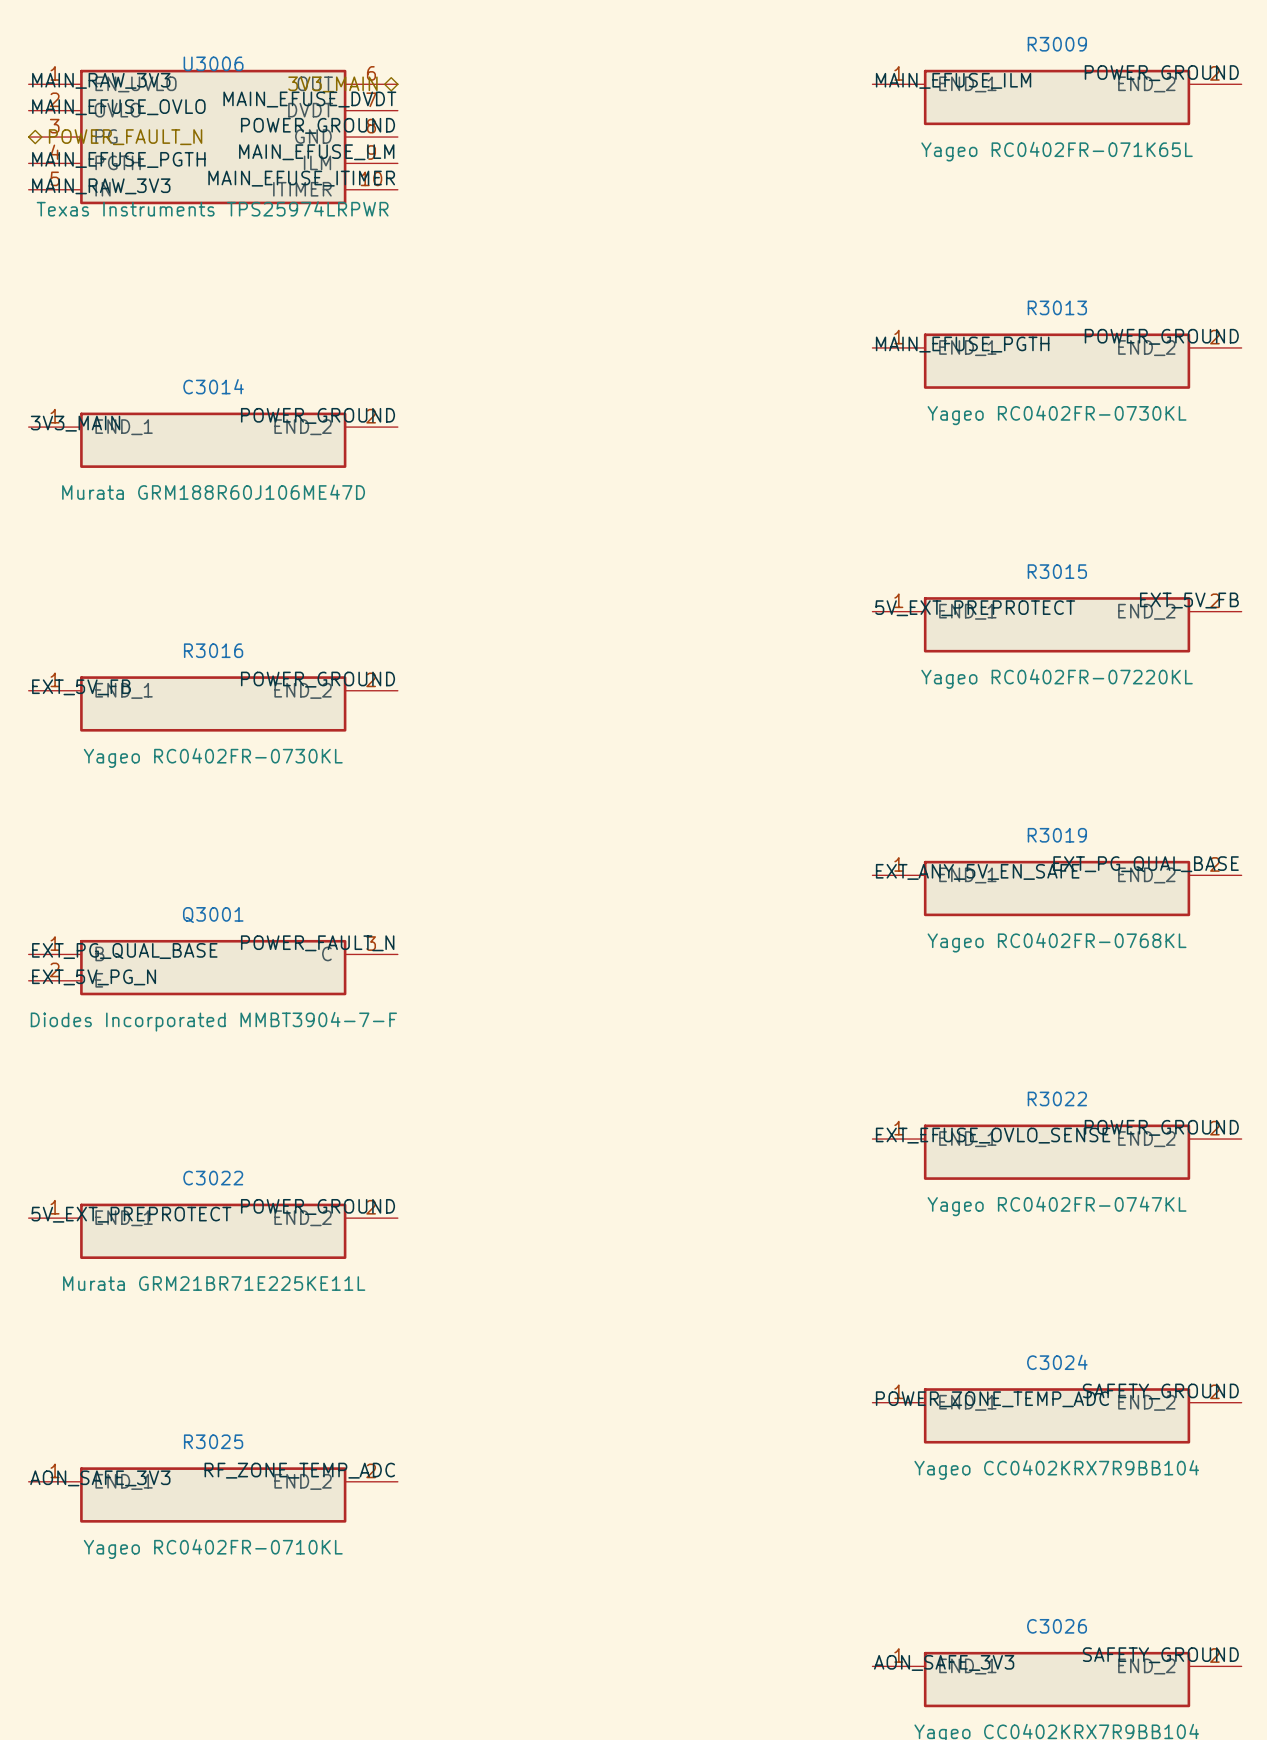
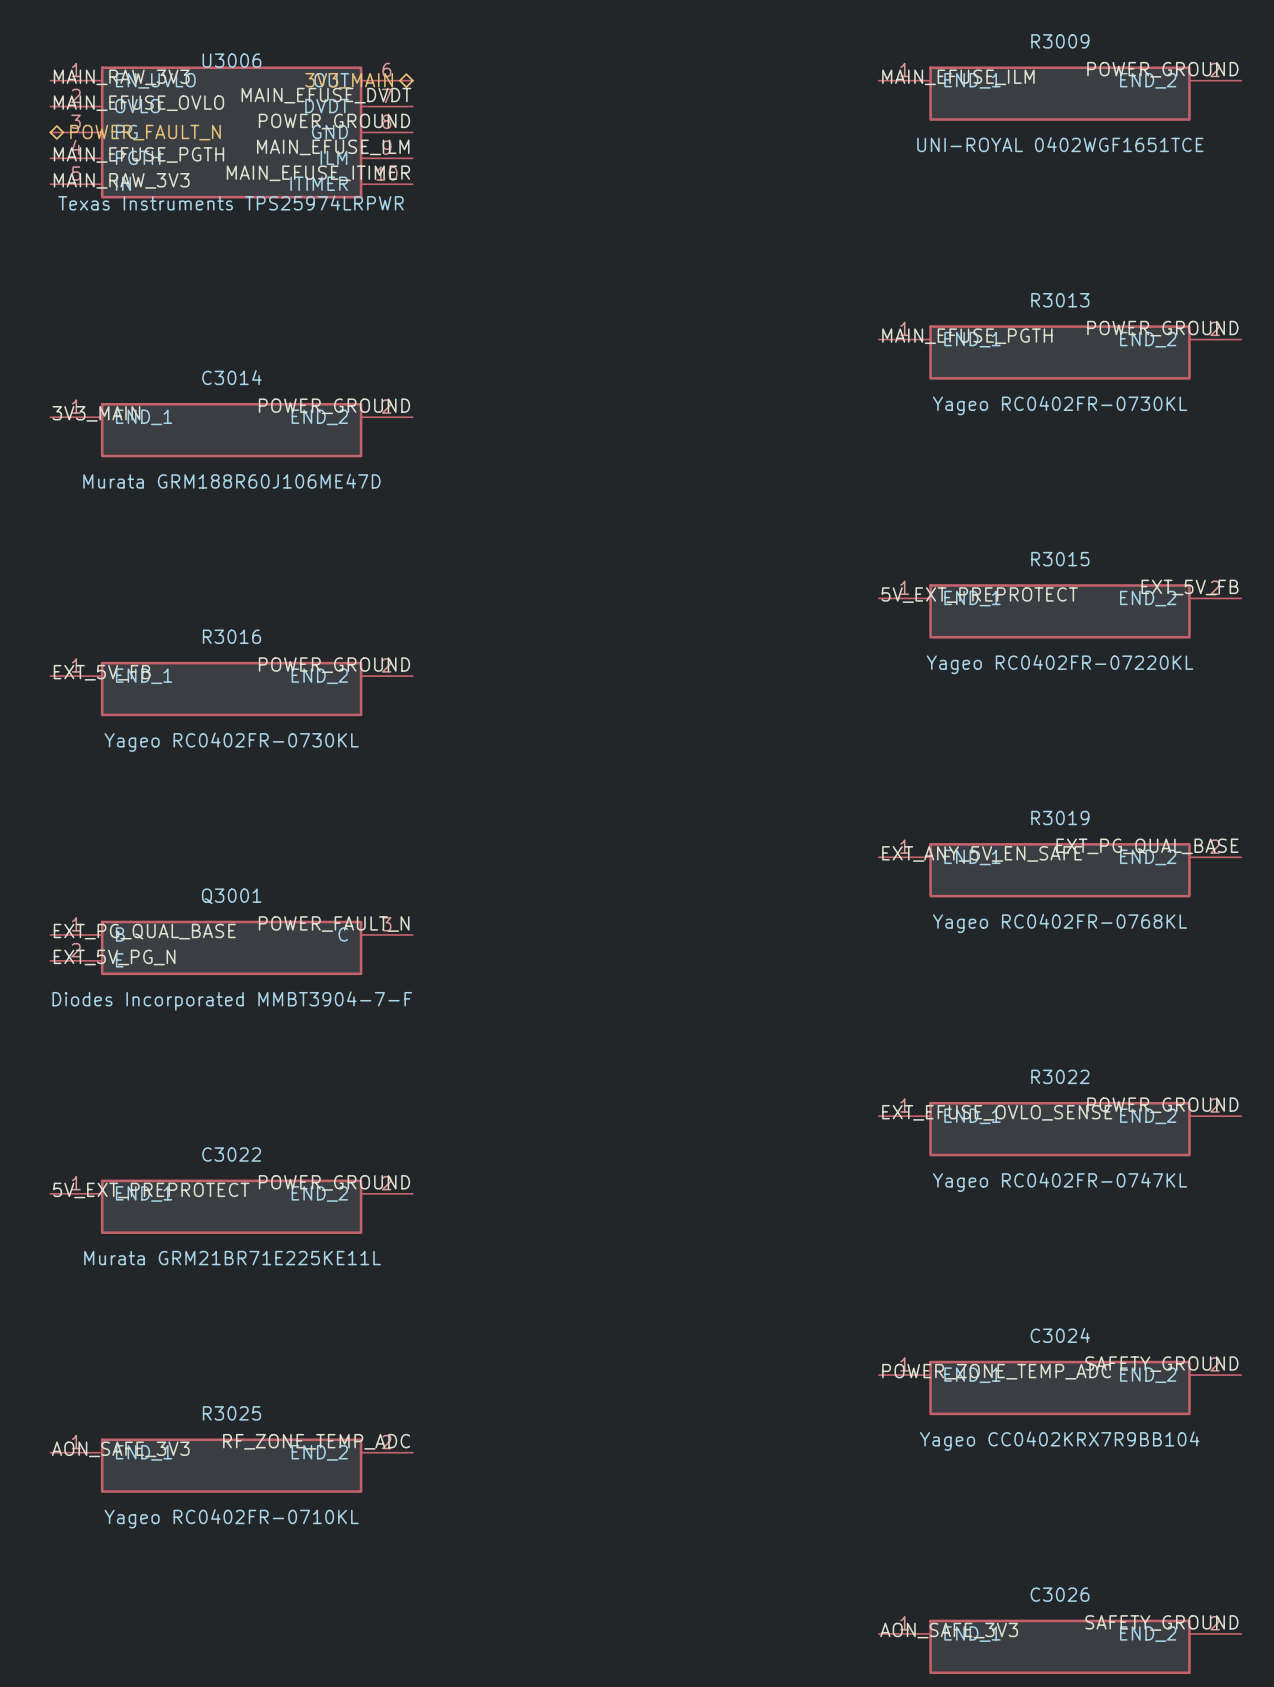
R3009 value: Yageo RC0402FR-071K65L (1057, 151) -> UNI-ROYAL 0402WGF1651TCE (1060, 144)

